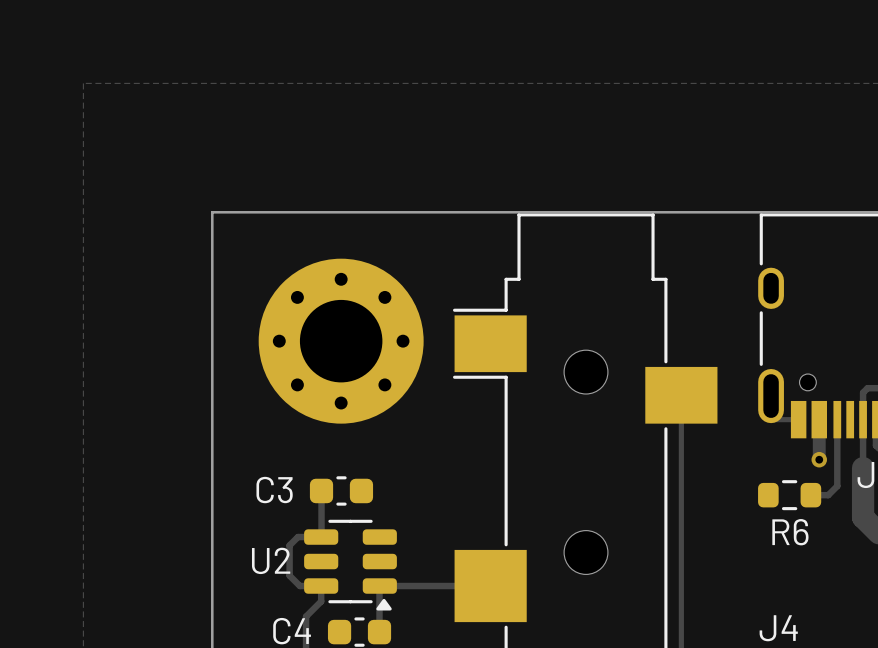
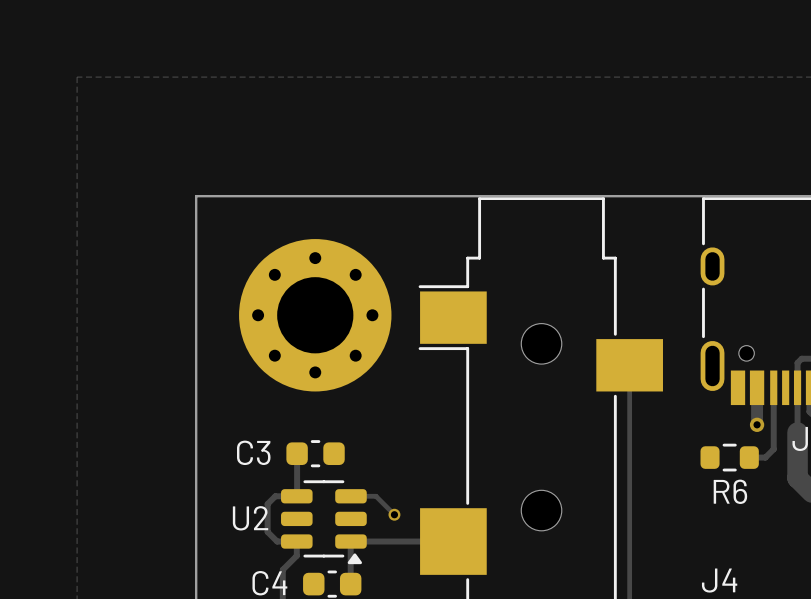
track: (771, 419) (798, 419) -> none
track: none -> (350, 496) (375, 496) (394, 514)
via: none -> (394, 514)

